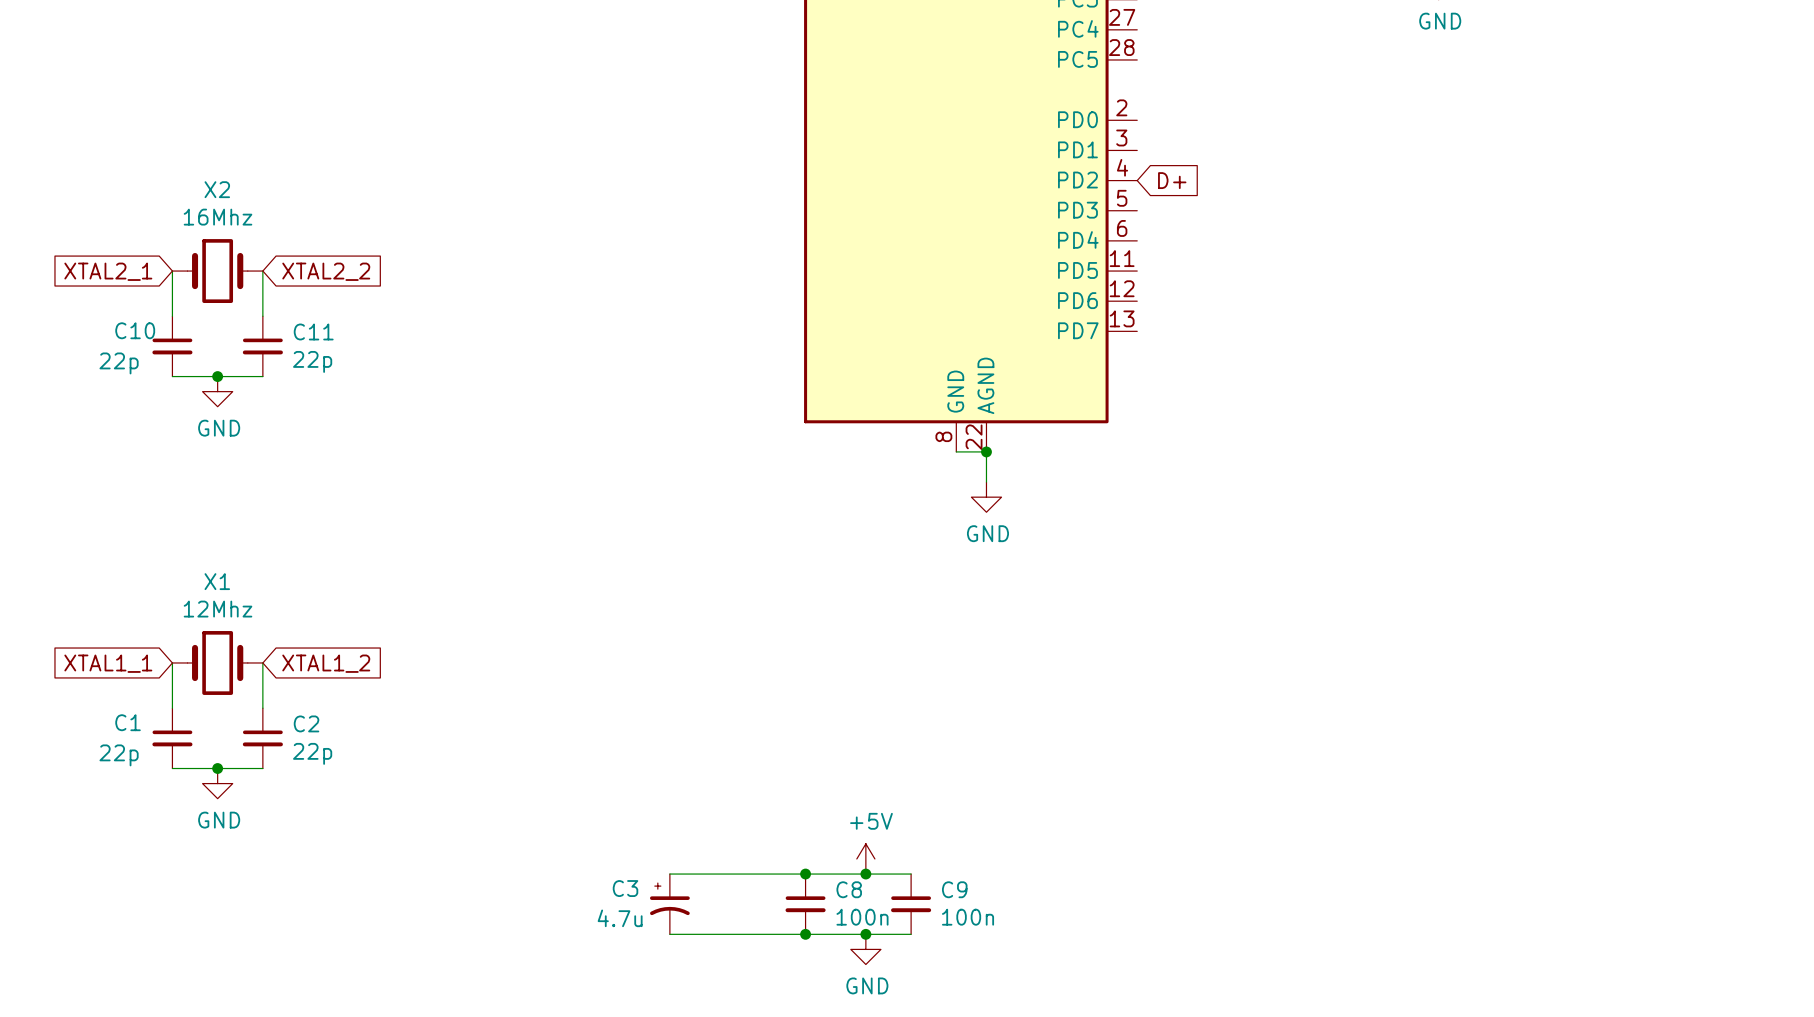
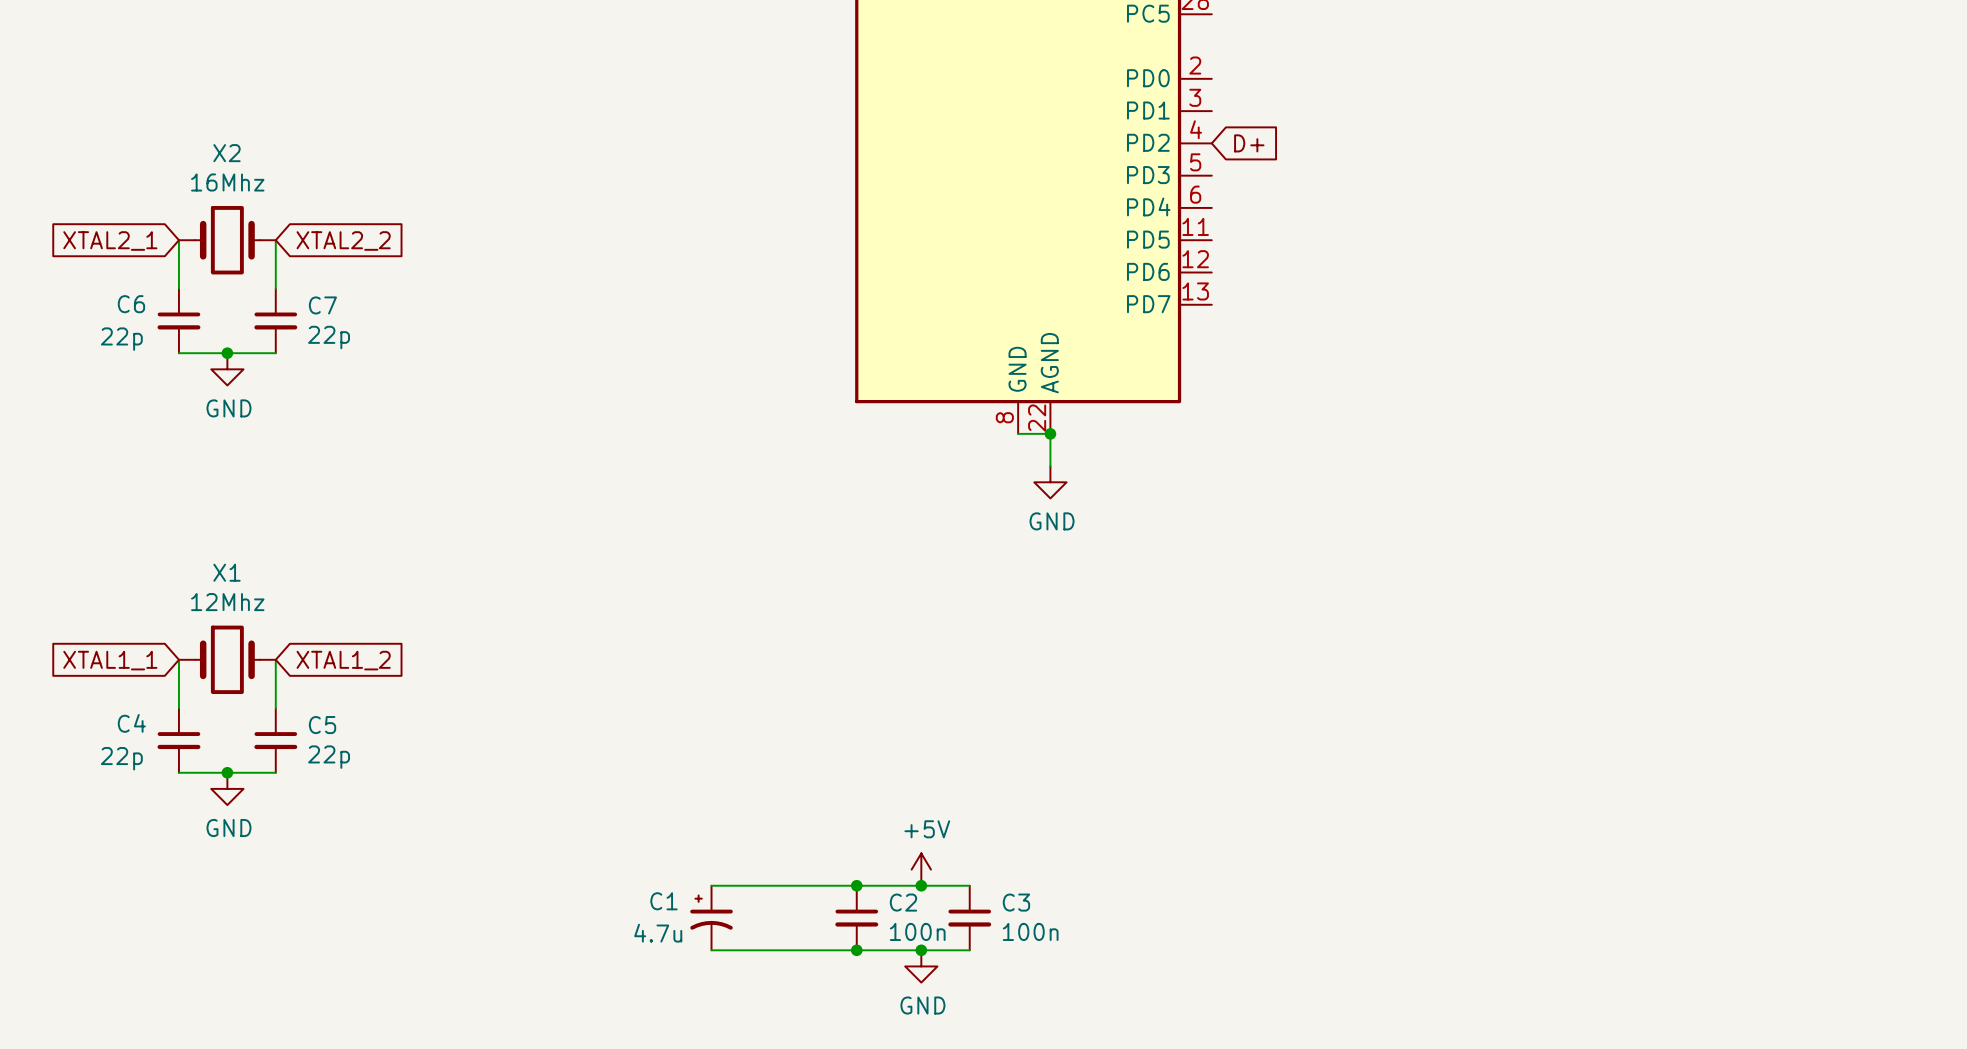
C10 name: C10 (135, 330) -> C6 (131, 304)
C11 name: C11 (313, 331) -> C7 (322, 305)
C1 name: C1 (128, 722) -> C4 (131, 723)
C2 name: C2 (306, 723) -> C5 (322, 725)
C3 name: C3 (625, 888) -> C1 (664, 901)
C8 name: C8 (849, 889) -> C2 (903, 902)
C9 name: C9 (954, 889) -> C3 (1016, 902)

